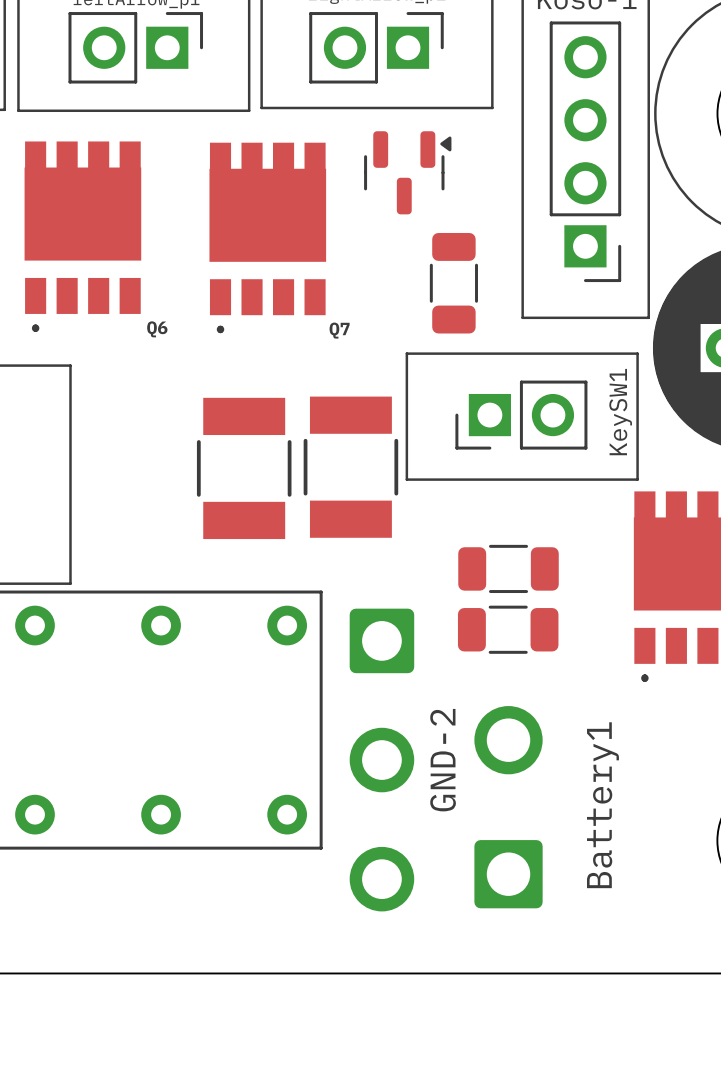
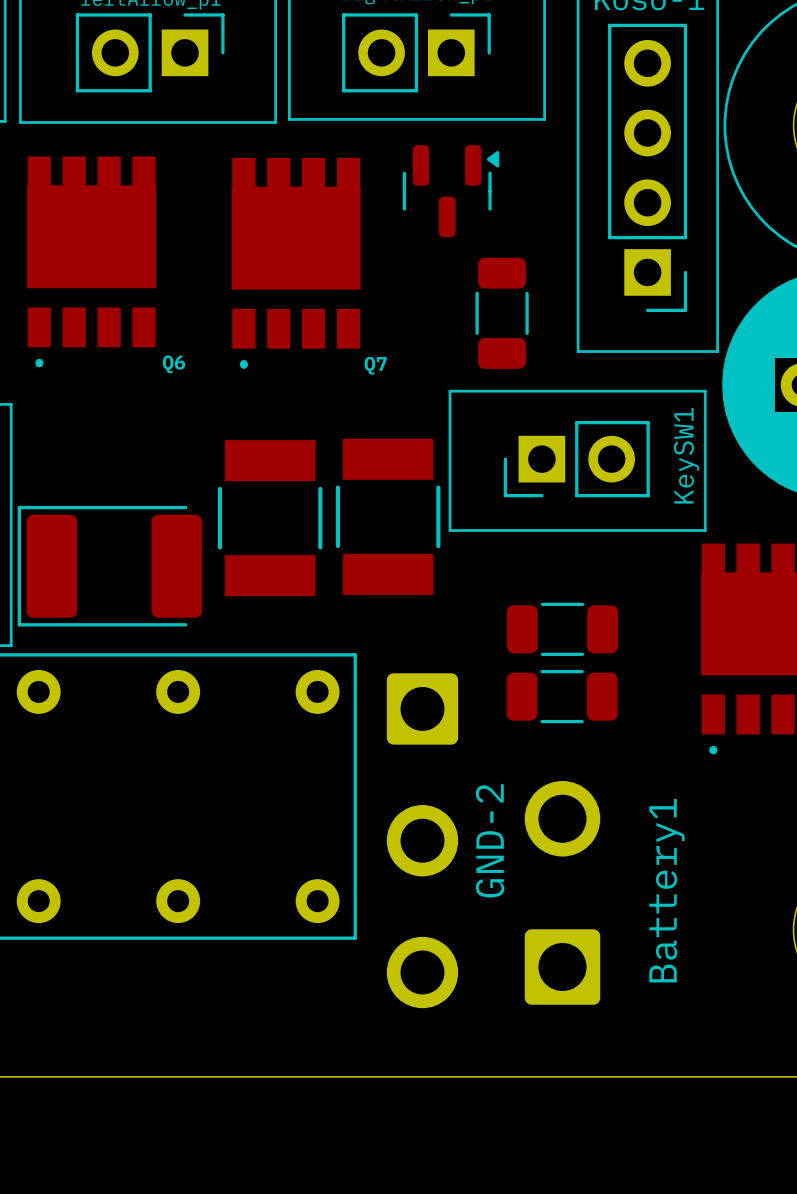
line: (10, 365) (70, 365) (70, 583) (10, 583) -> (11, 404) (11, 645)
part: none -> (109, 566)

